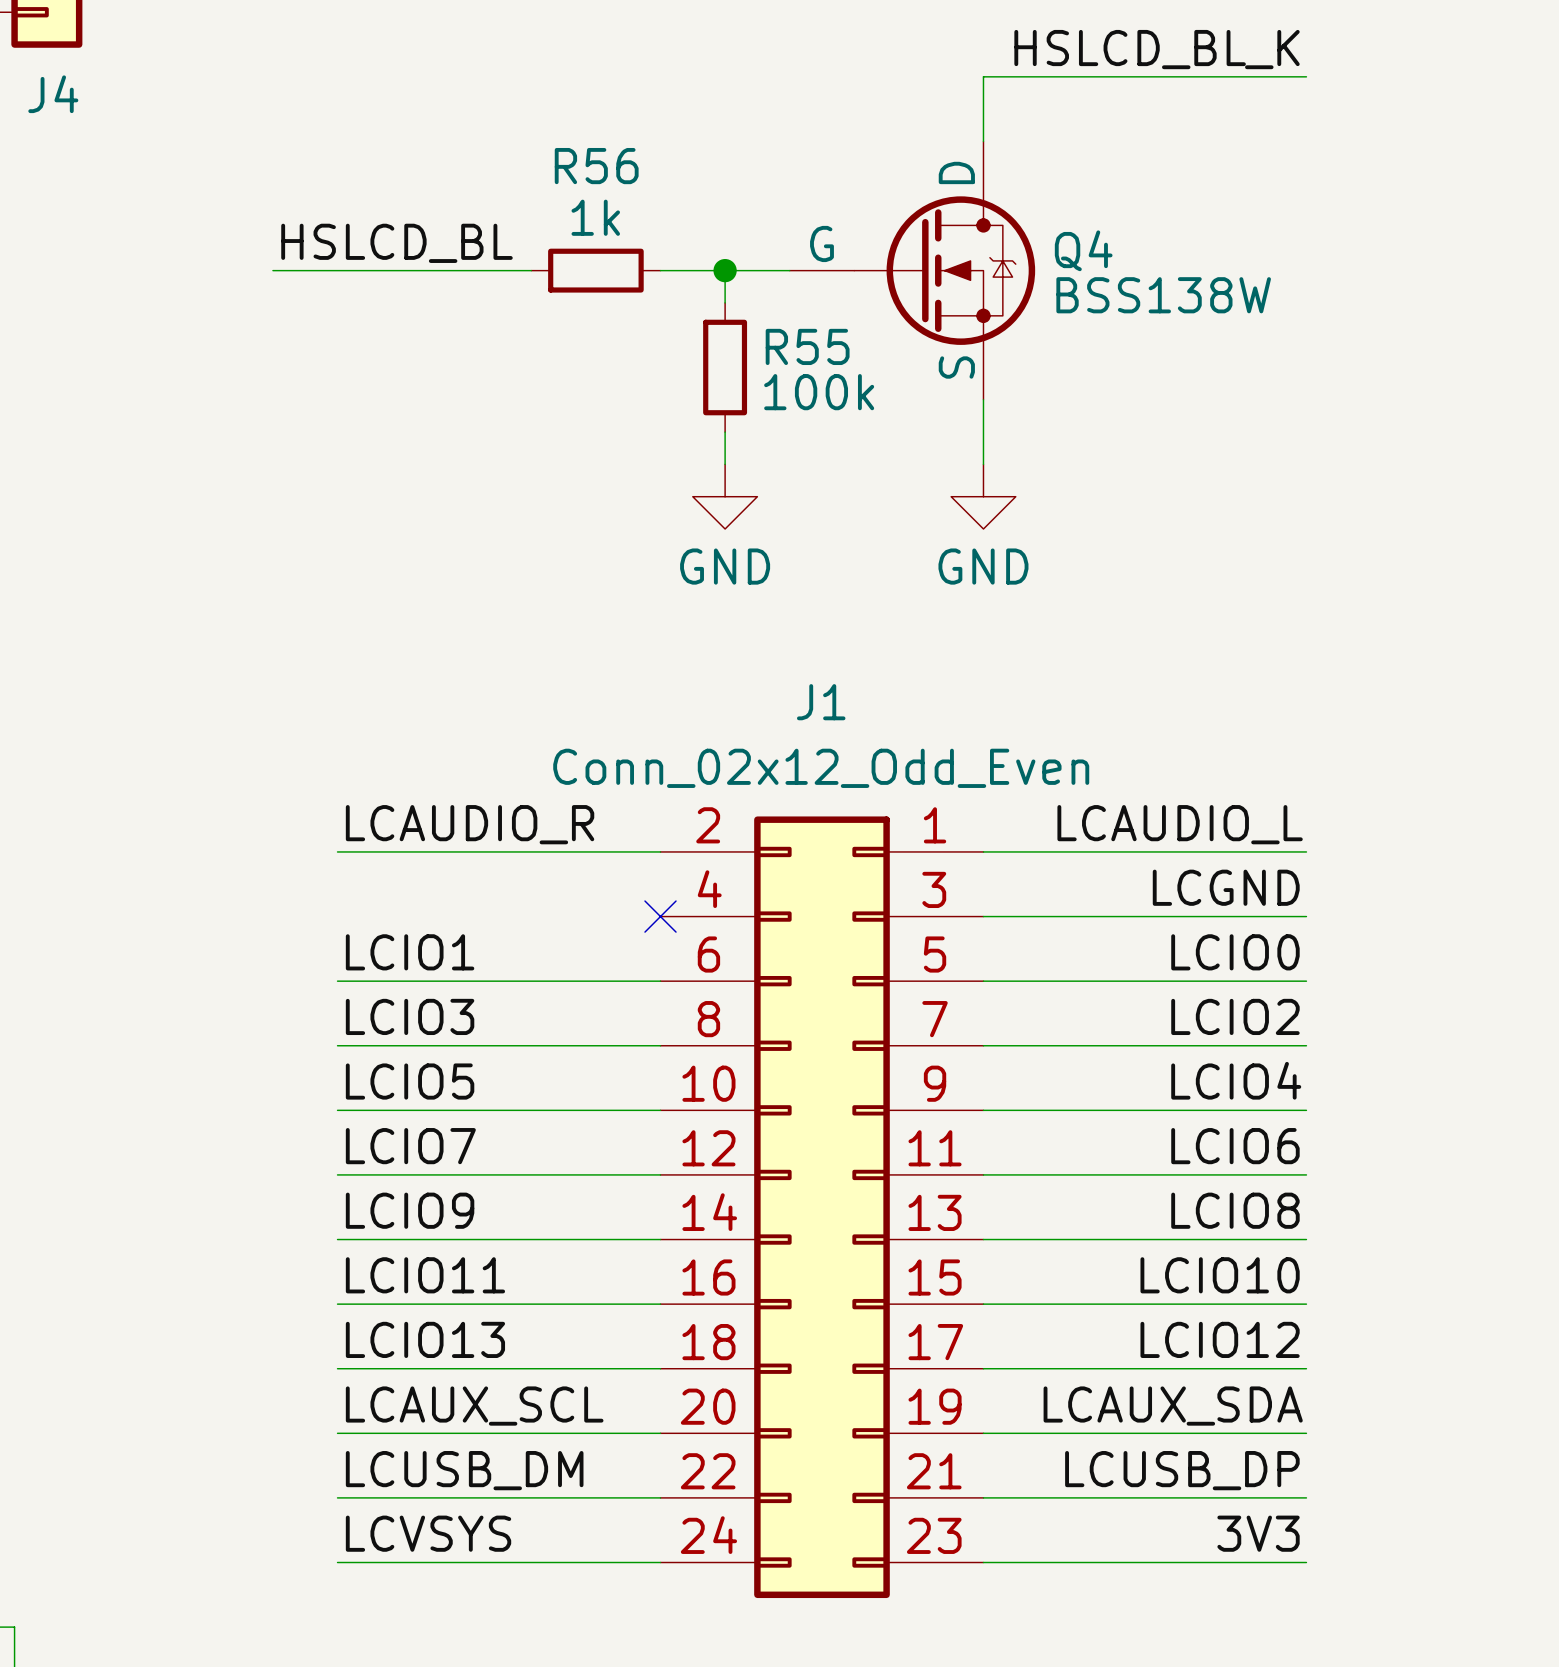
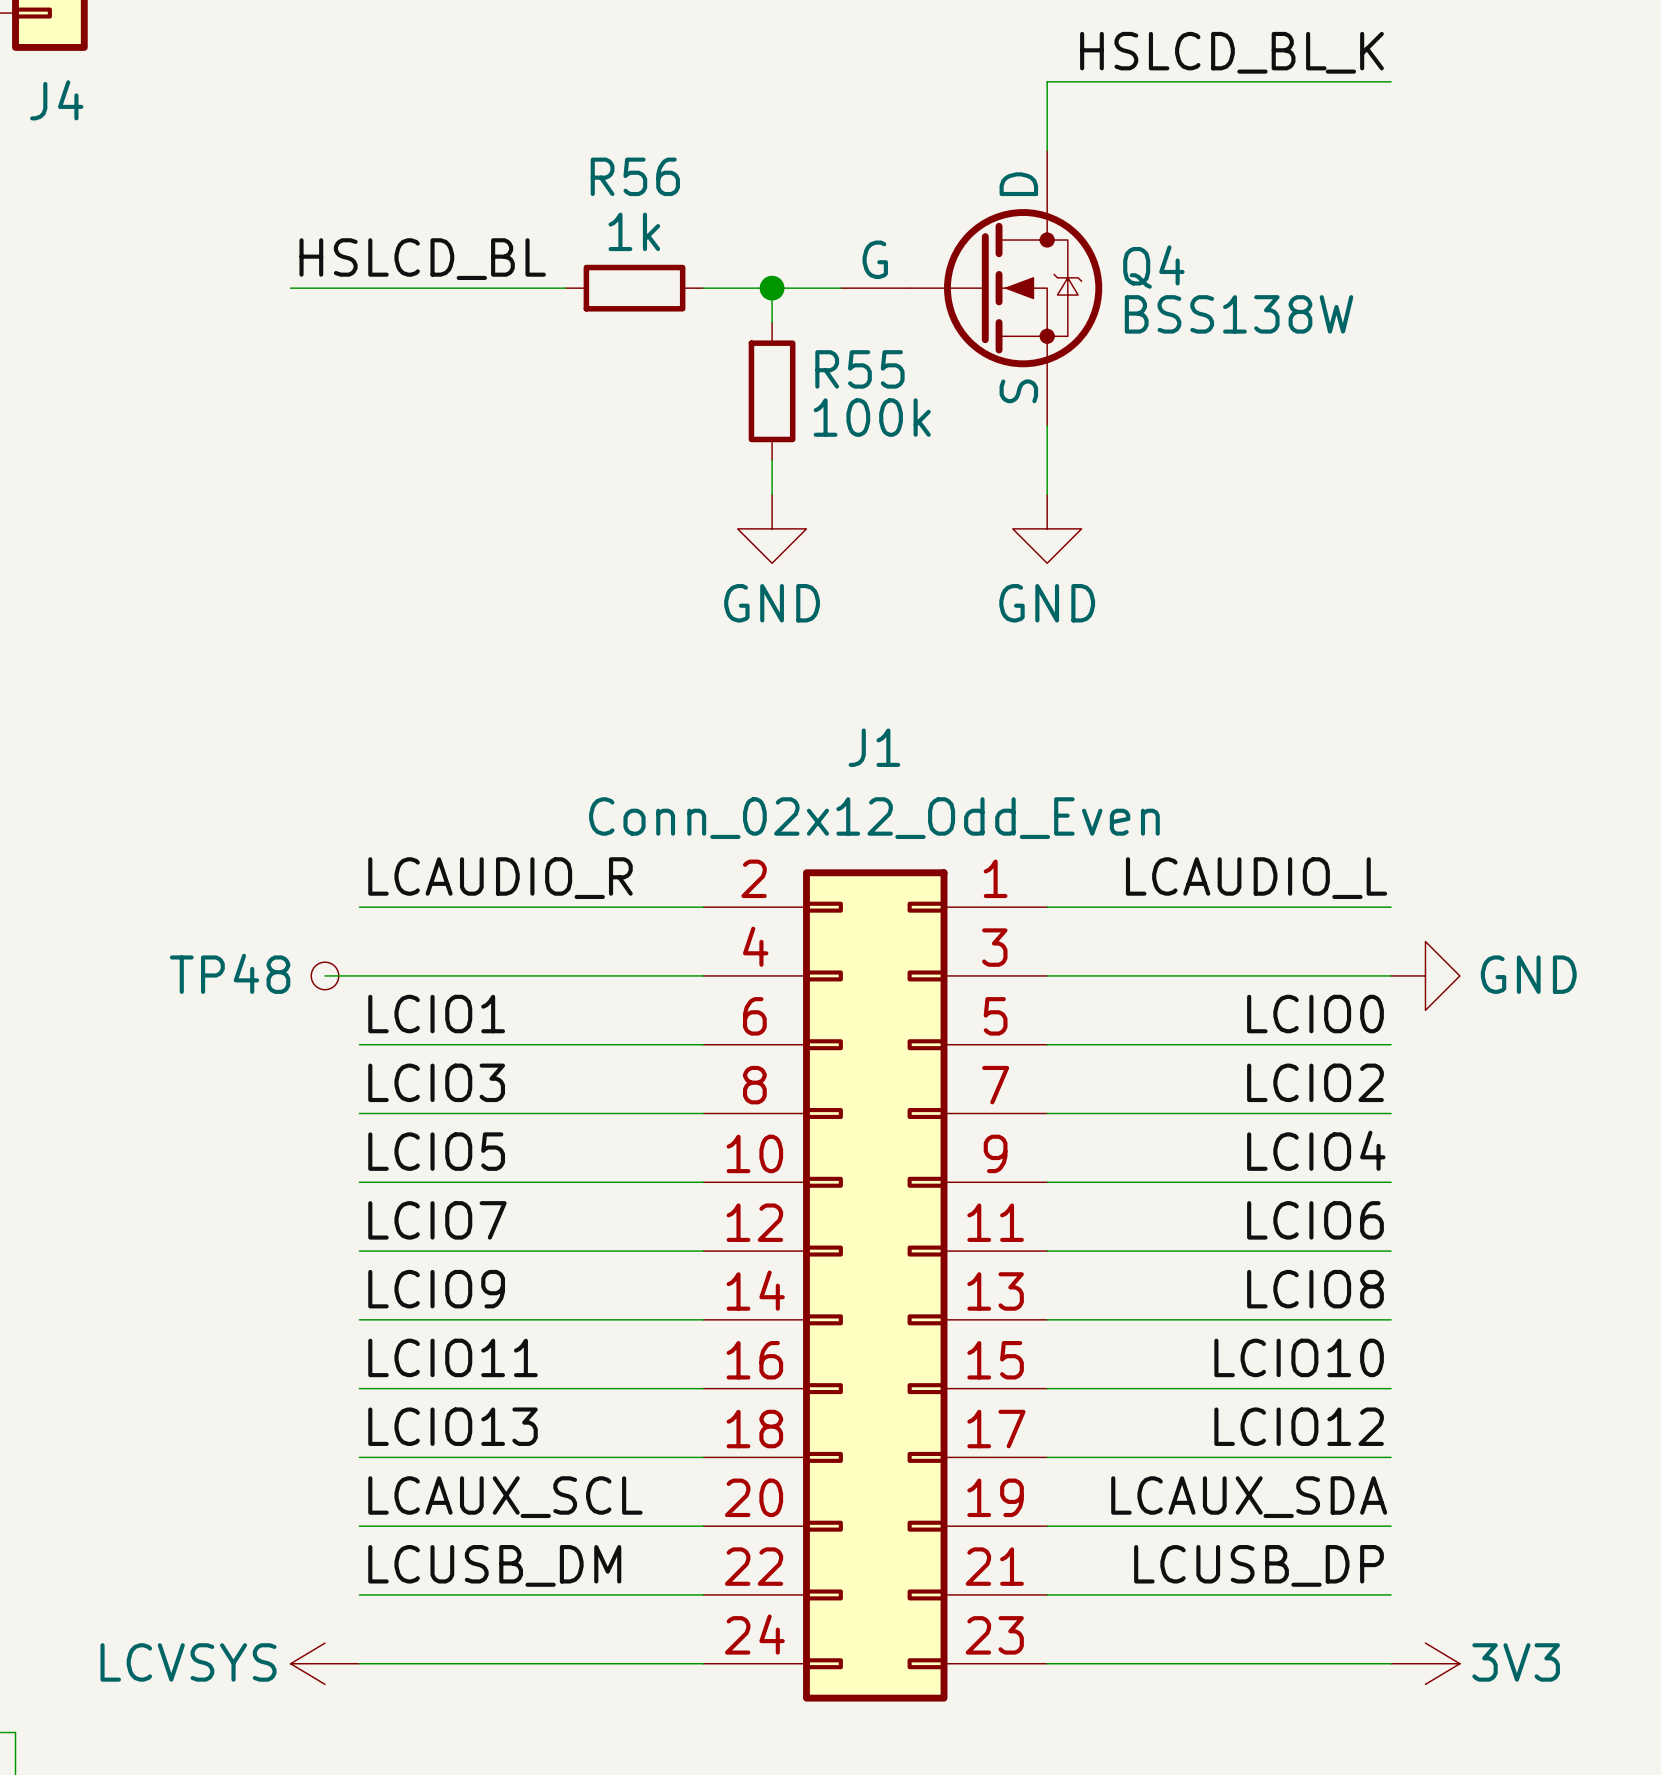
label: LCGND (1226, 887) -> none
wire: none -> (325, 975) (703, 975)
TP48: none -> (325, 975)
no-connect mark: (660, 916) -> none
power symbol: none -> GND (1425, 975)
label: LCVSYS (428, 1533) -> none
label: 3V3 (1258, 1533) -> none
power symbol: none -> LCVSYS (325, 1663)
power symbol: none -> 3V3 (1425, 1663)

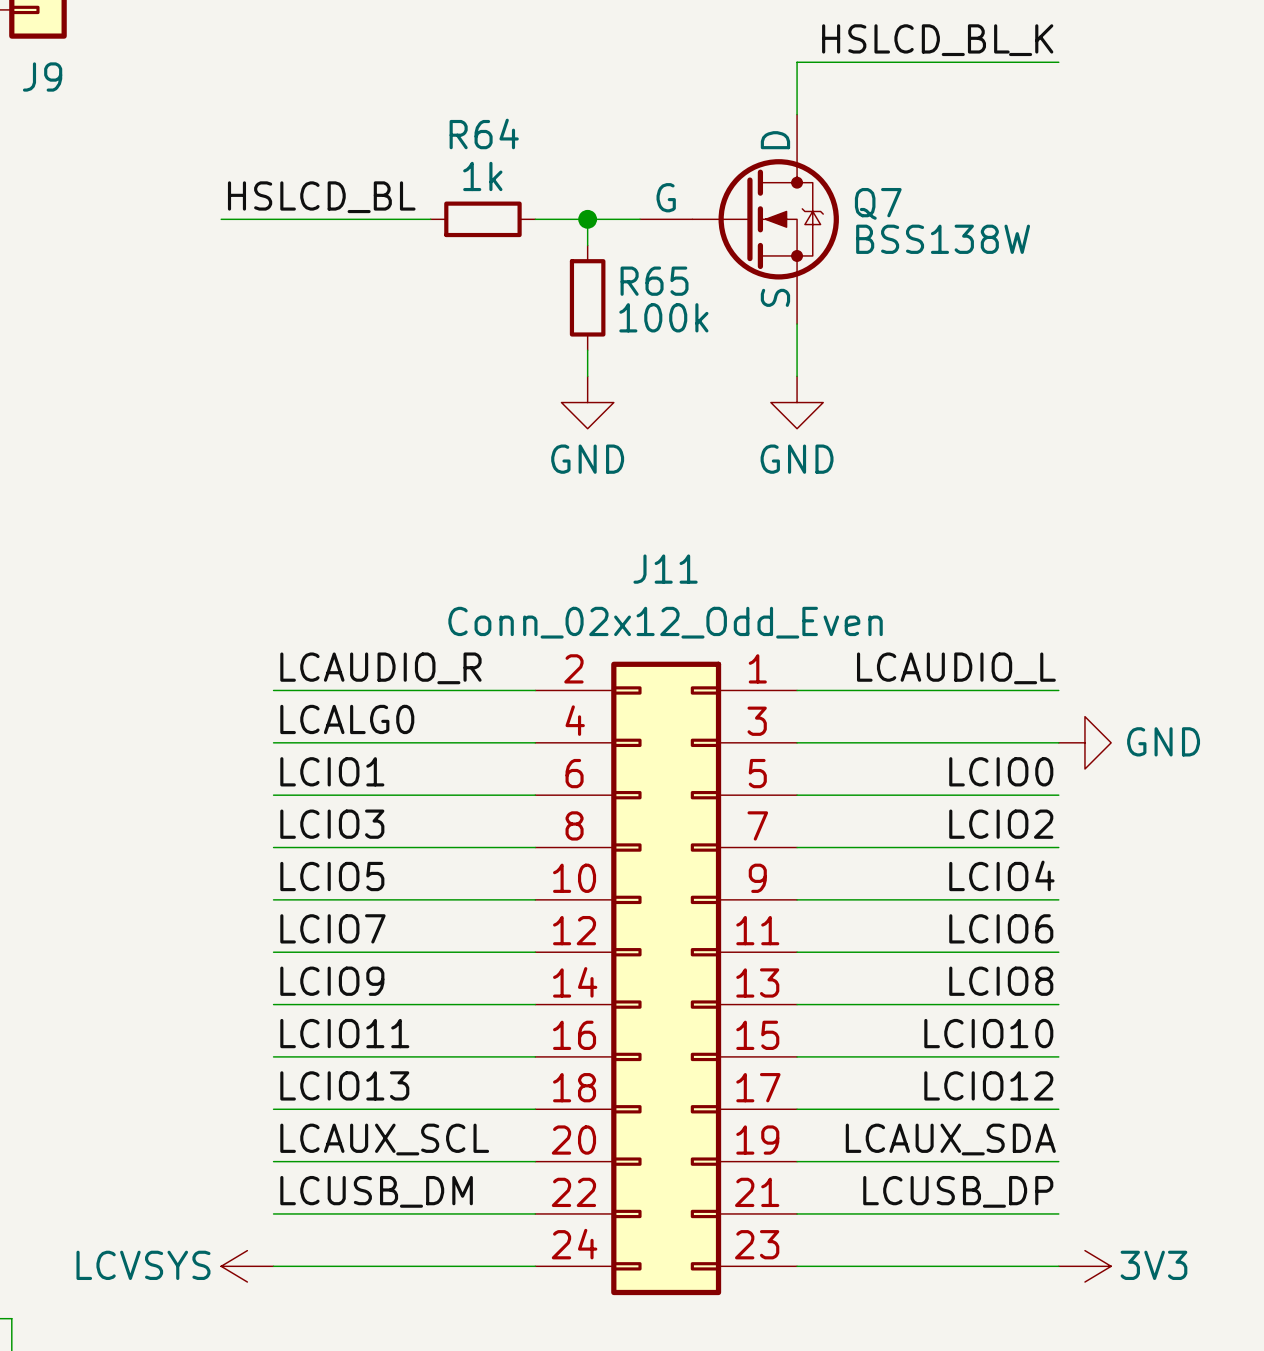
J4 name: J4 (56, 100) -> J9 (42, 77)
R56 name: R56 (635, 176) -> R64 (484, 133)
Q4 name: Q4 (1153, 267) -> Q7 (878, 203)
R55 name: R55 (859, 369) -> R65 (654, 281)
J1 name: J1 (874, 747) -> J11 (665, 569)
label: none -> LCALG0 (347, 719)
wire: (325, 975) (359, 975) -> none
TP48: (325, 975) -> none

